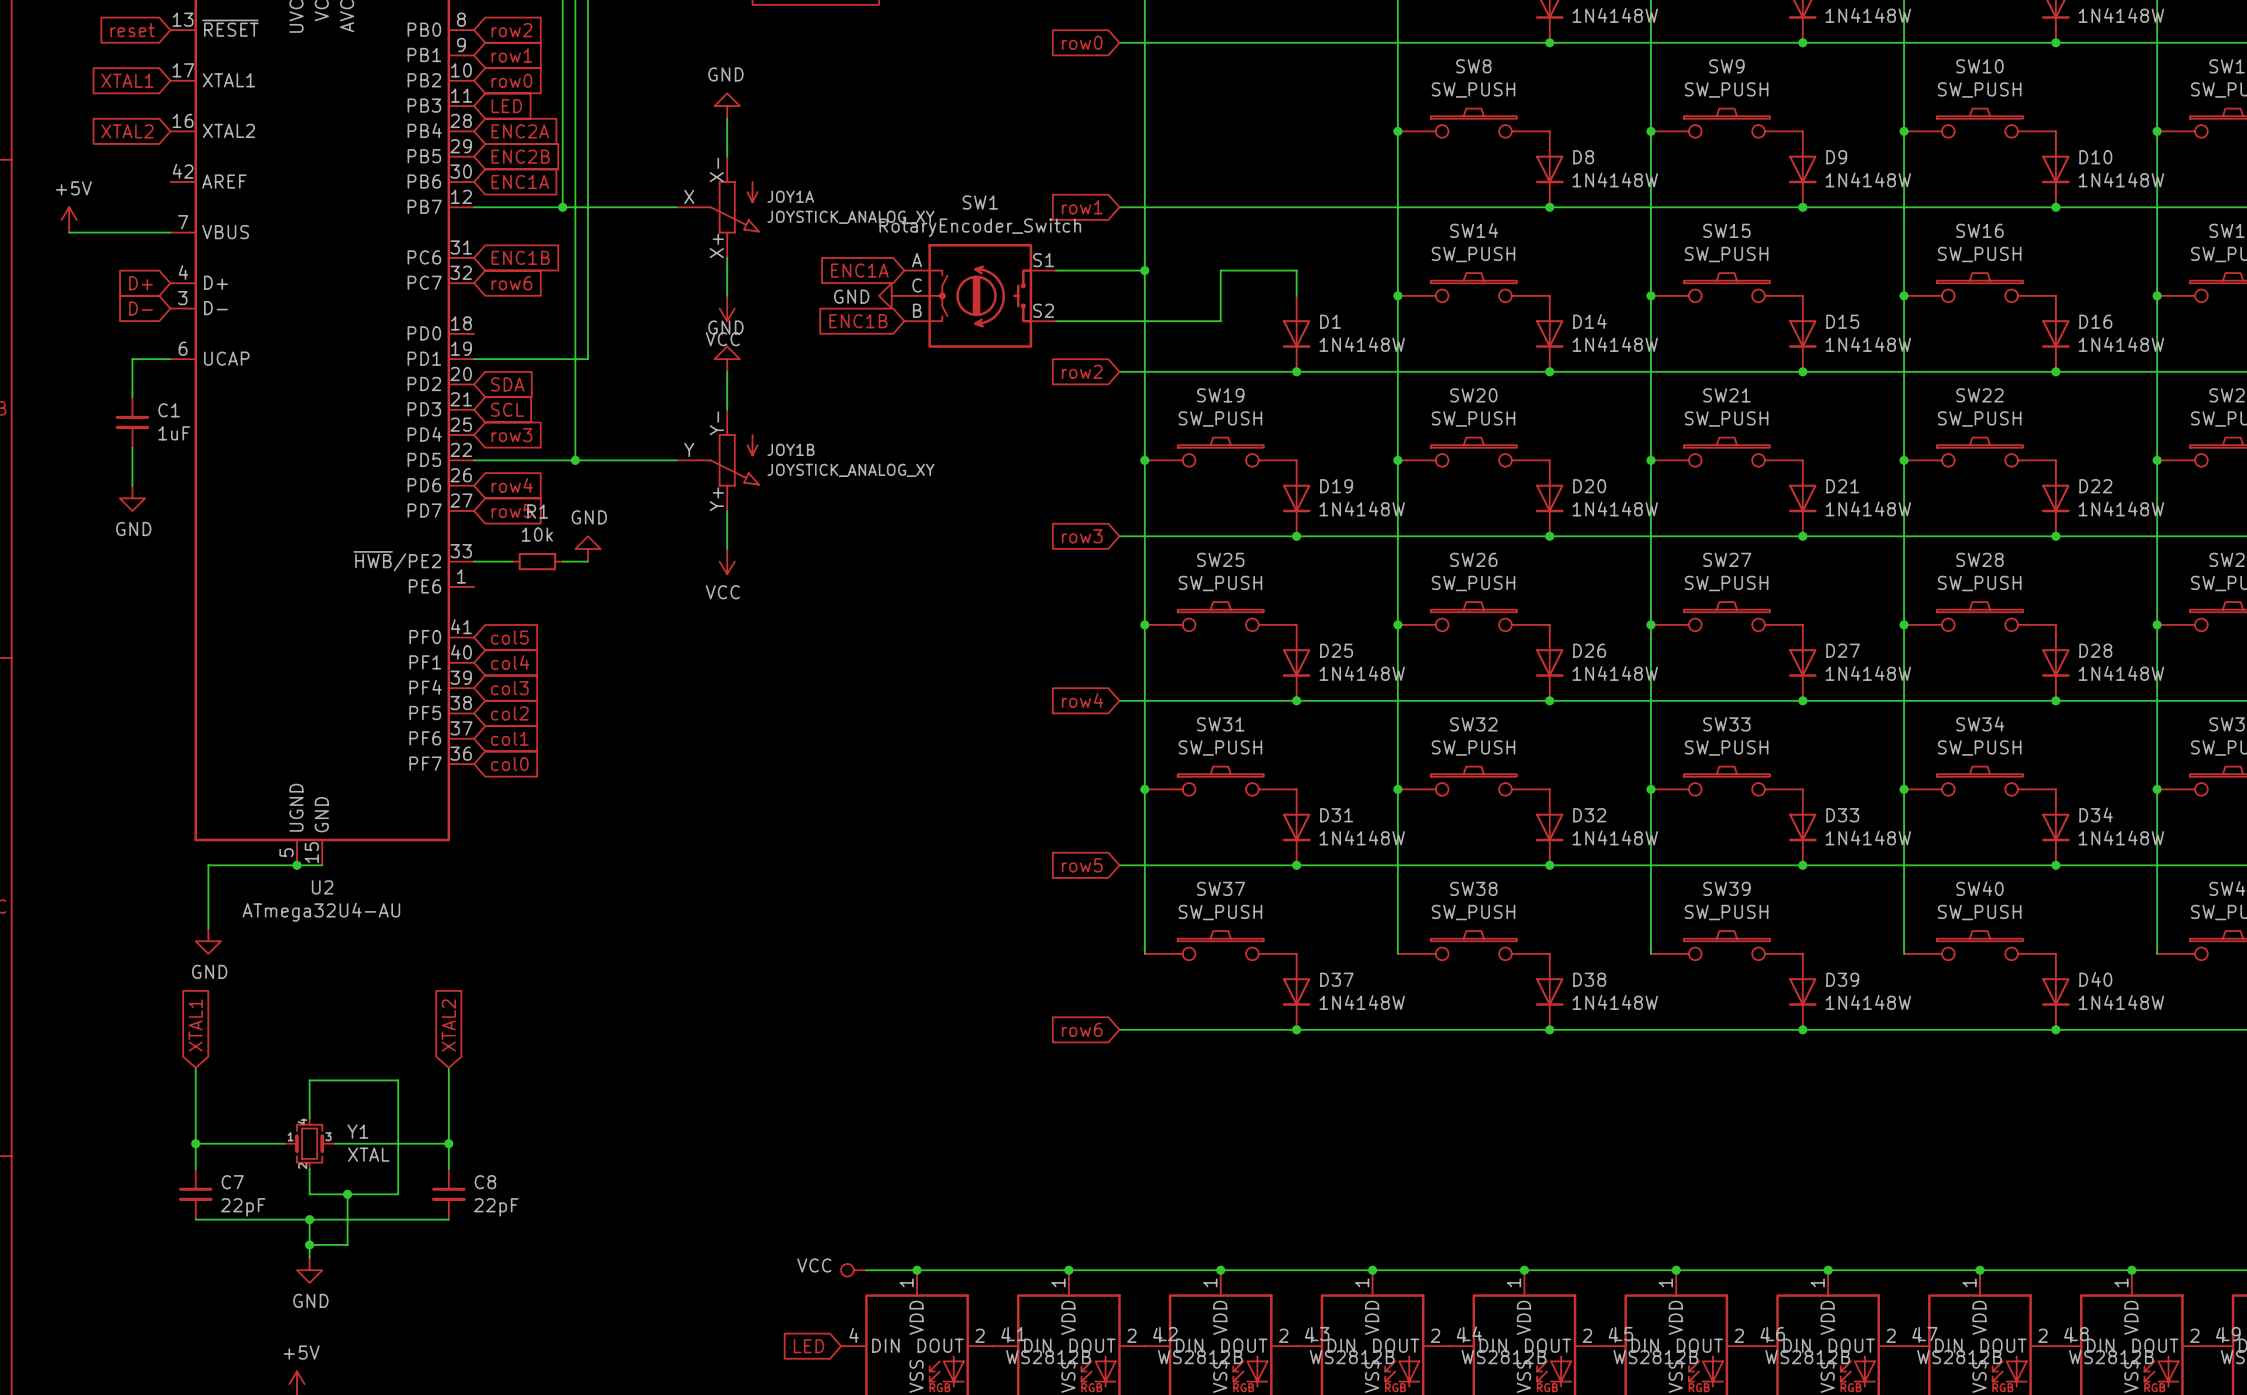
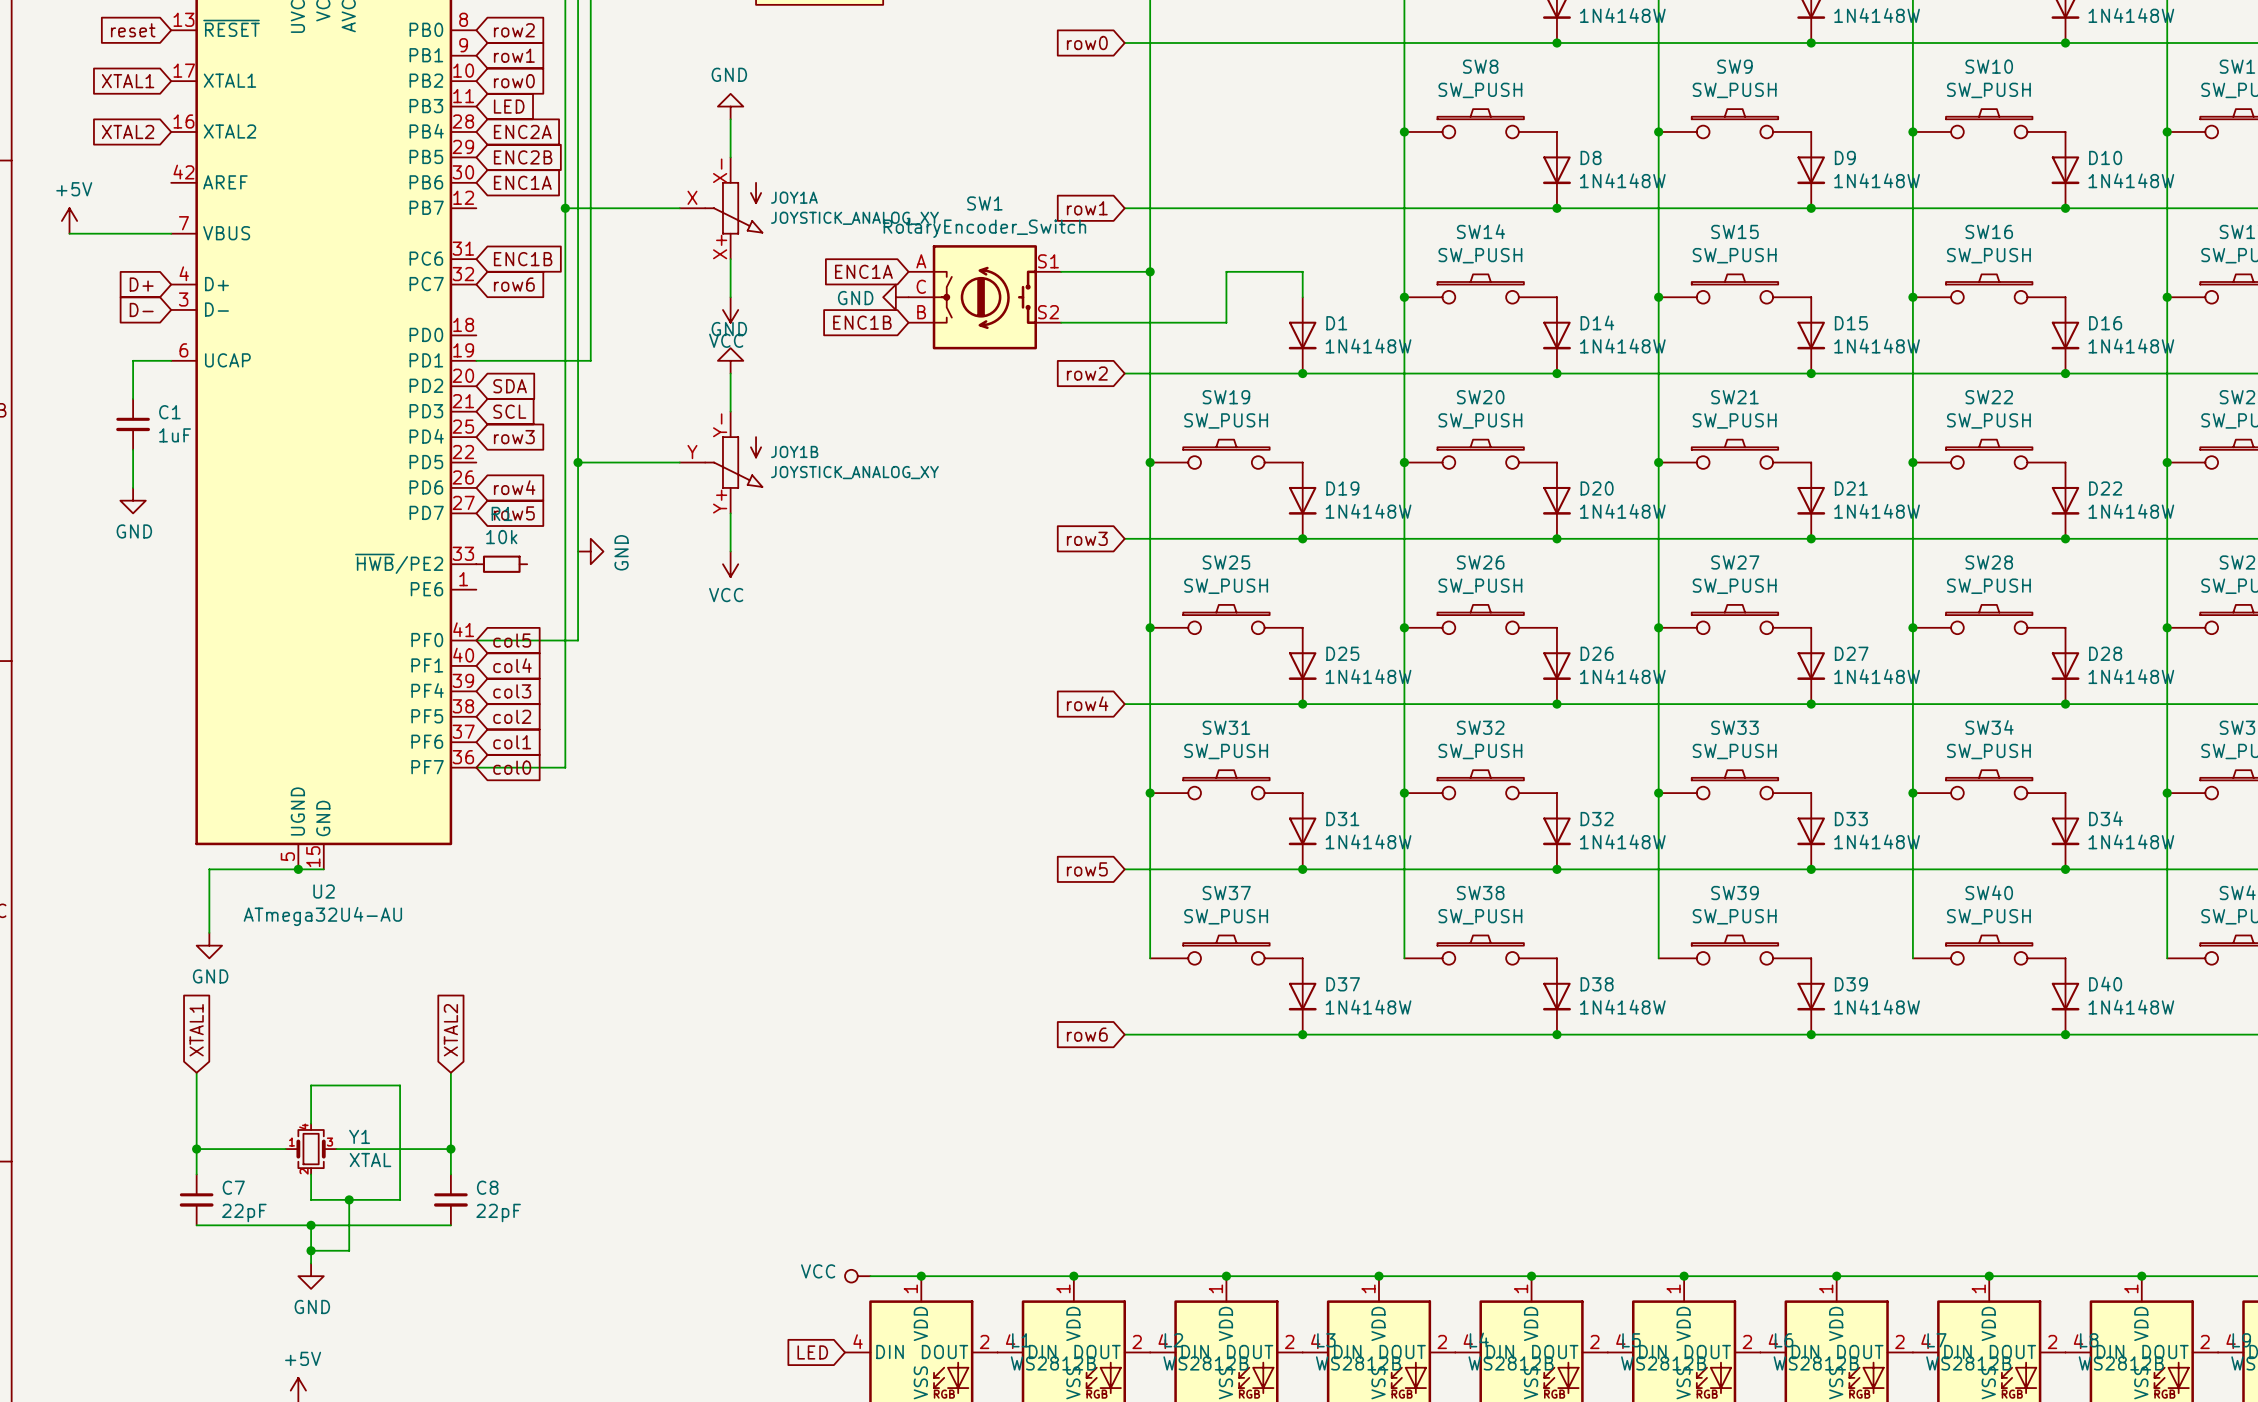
wire: (474, 207) (562, 207) -> (476, 767) (565, 767) (565, 208)
wire: (474, 460) (575, 460) -> (476, 640) (578, 640) (578, 462)
power symbol rotation: 0° (588, 548) -> 90° clockwise (590, 551)
wire: (474, 561) (512, 561) -> none
R1 position: (537, 561) -> (501, 564)
wire: (562, 561) (588, 561) -> none

